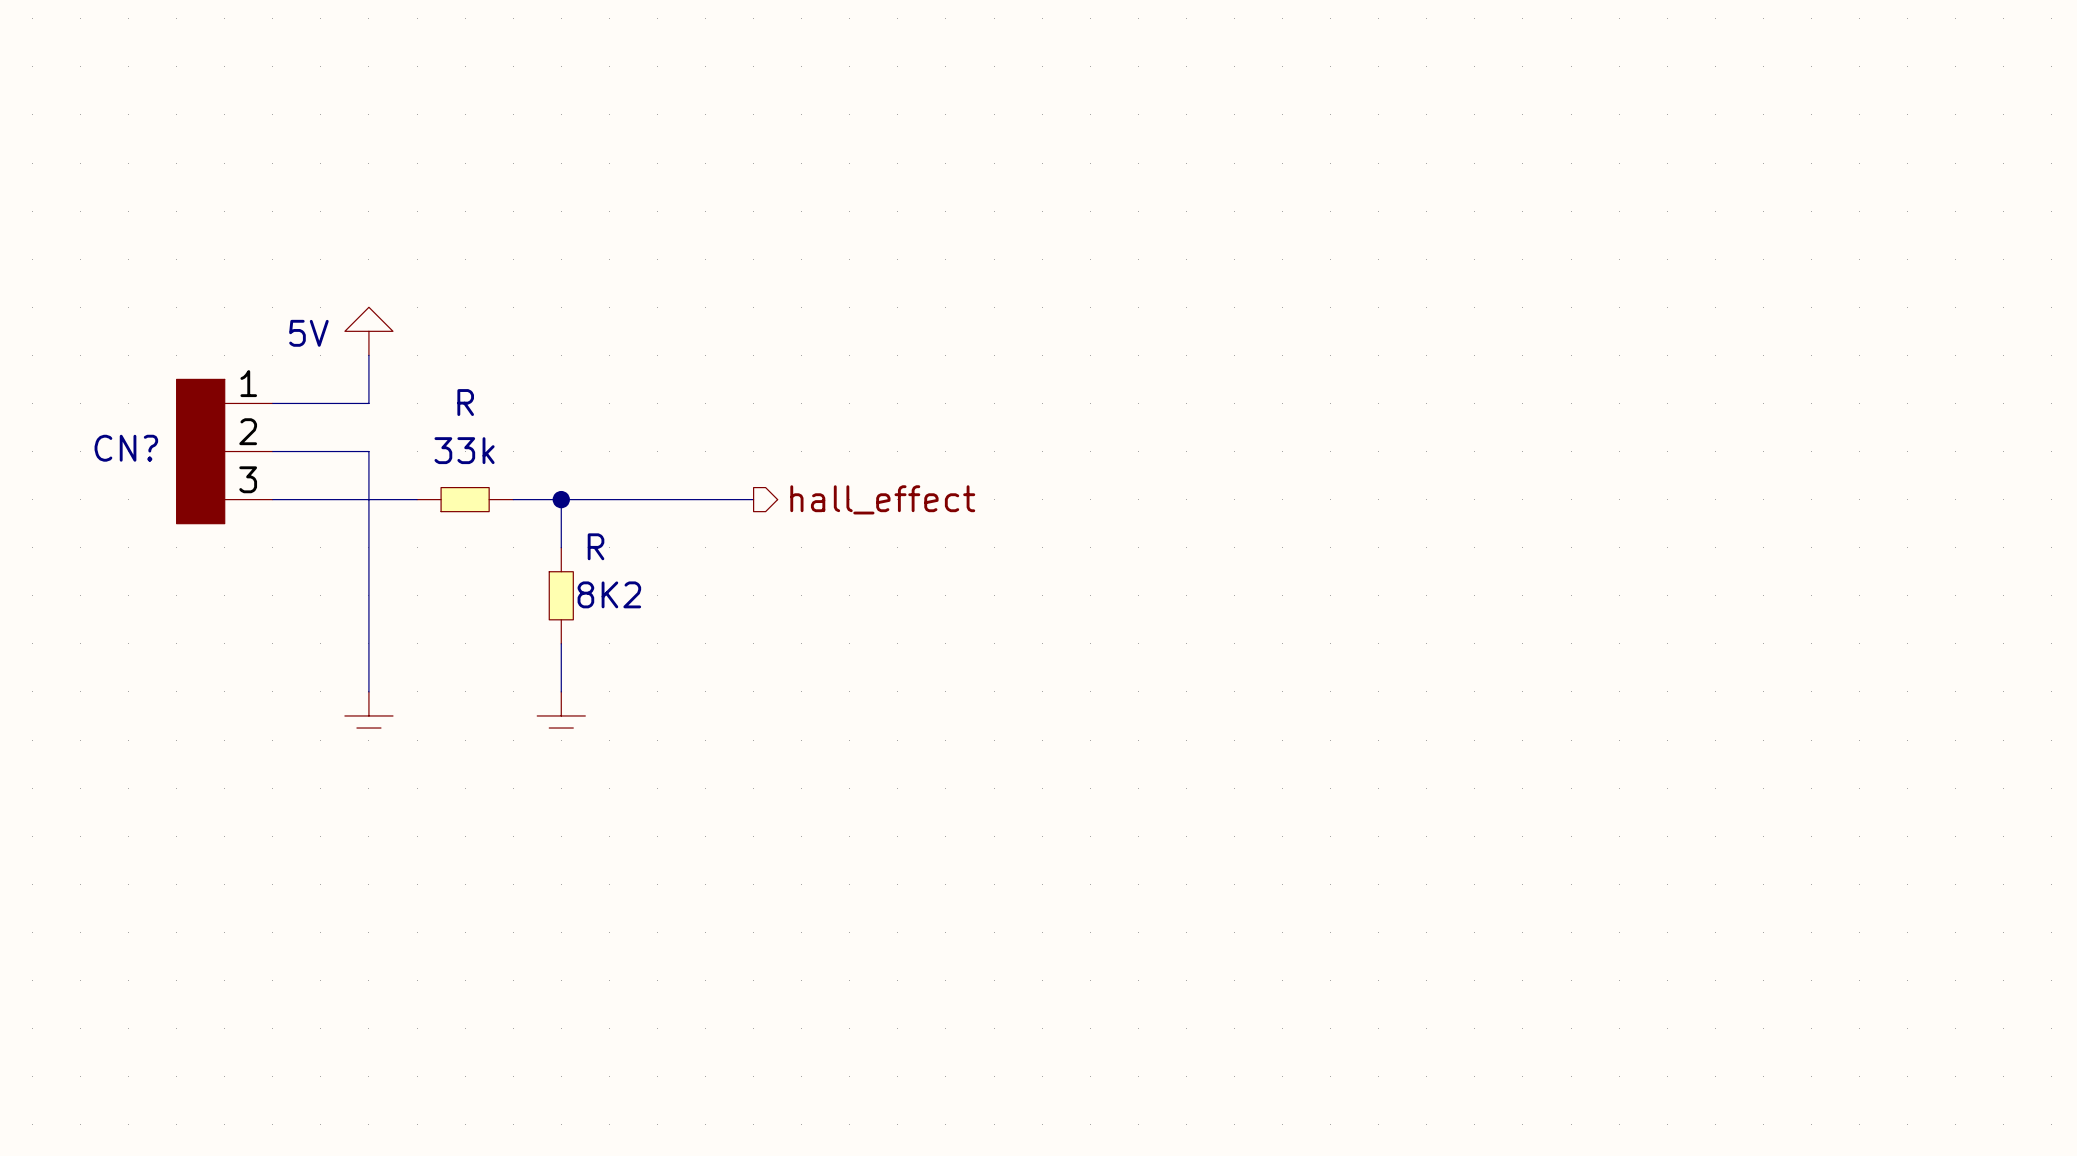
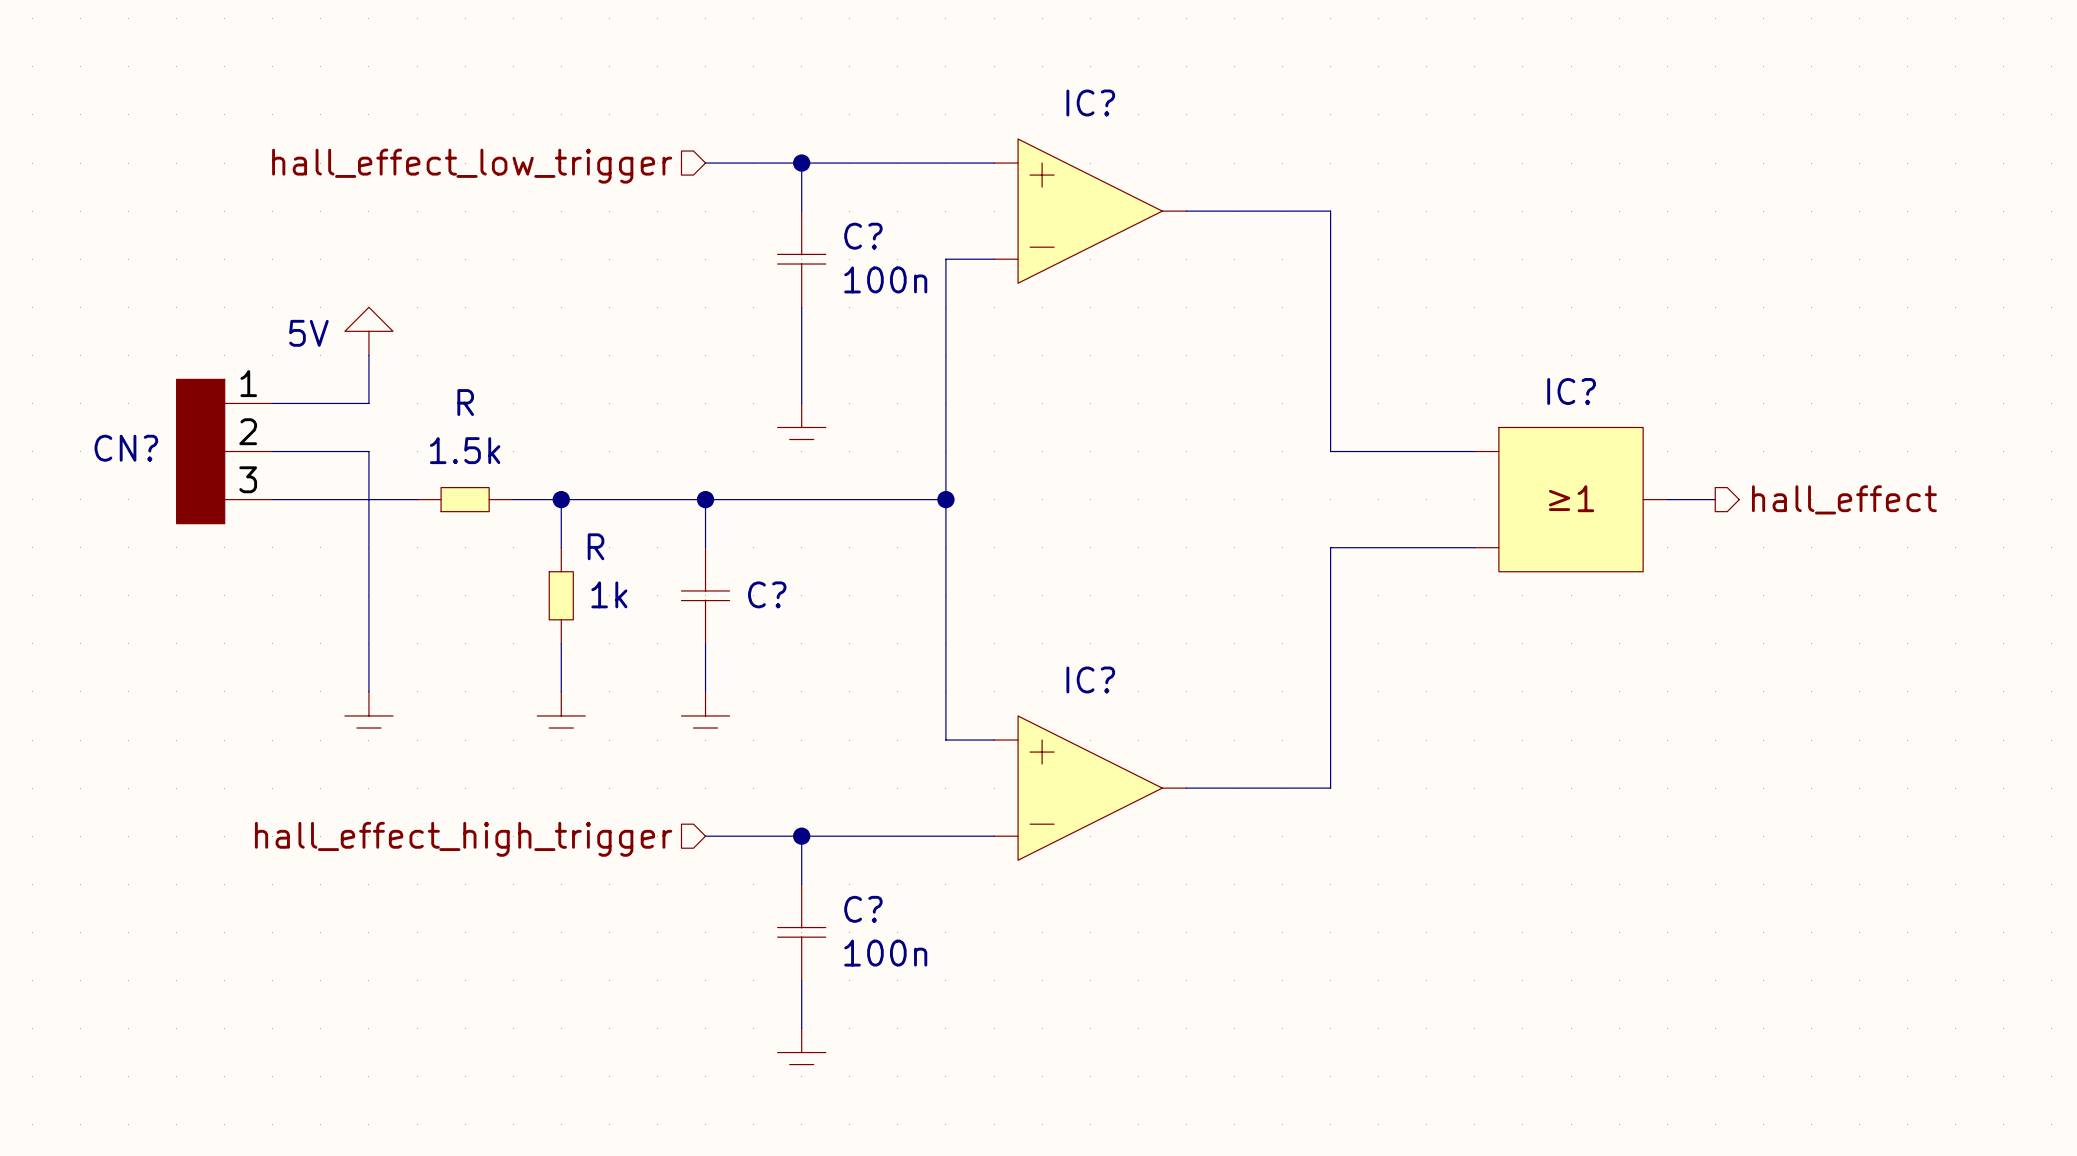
wire: none -> (705, 163) (994, 163)
wire: none -> (801, 163) (801, 211)
junction: none -> (801, 163)
hierarchical label: none -> hall_effect_low_trigger (472, 166)
IC?: none -> (1090, 211)
wire: none -> (1186, 211) (1330, 211) (1330, 451) (1474, 451)
C?: none -> 100n (801, 259)
wire: none -> (994, 259) (945, 259) (945, 740) (994, 740)
wire: none -> (801, 307) (801, 403)
power symbol: none -> (801, 427)
R value: 33k (464, 450) -> 1.5k (465, 450)
wire: none -> (705, 499) (705, 547)
junction: none -> (705, 499)
wire: none -> (753, 499) (945, 499)
hierarchical label: hall_effect (882, 499) -> none
junction: none -> (945, 499)
IC?: none -> (1571, 499)
wire: none -> (1667, 499) (1715, 499)
hierarchical label: none -> hall_effect (1844, 499)
wire: none -> (1474, 547) (1330, 547) (1330, 788) (1186, 788)
R value: 8K2 (609, 594) -> 1k (609, 594)
C?: none -> (705, 595)
wire: none -> (705, 643) (705, 691)
power symbol: none -> (705, 715)
IC?: none -> (1090, 788)
wire: none -> (705, 836) (994, 836)
wire: none -> (801, 836) (801, 884)
junction: none -> (801, 836)
hierarchical label: none -> hall_effect_high_trigger (463, 839)
C?: none -> 100n (801, 932)
wire: none -> (801, 980) (801, 1028)
power symbol: none -> (801, 1052)

